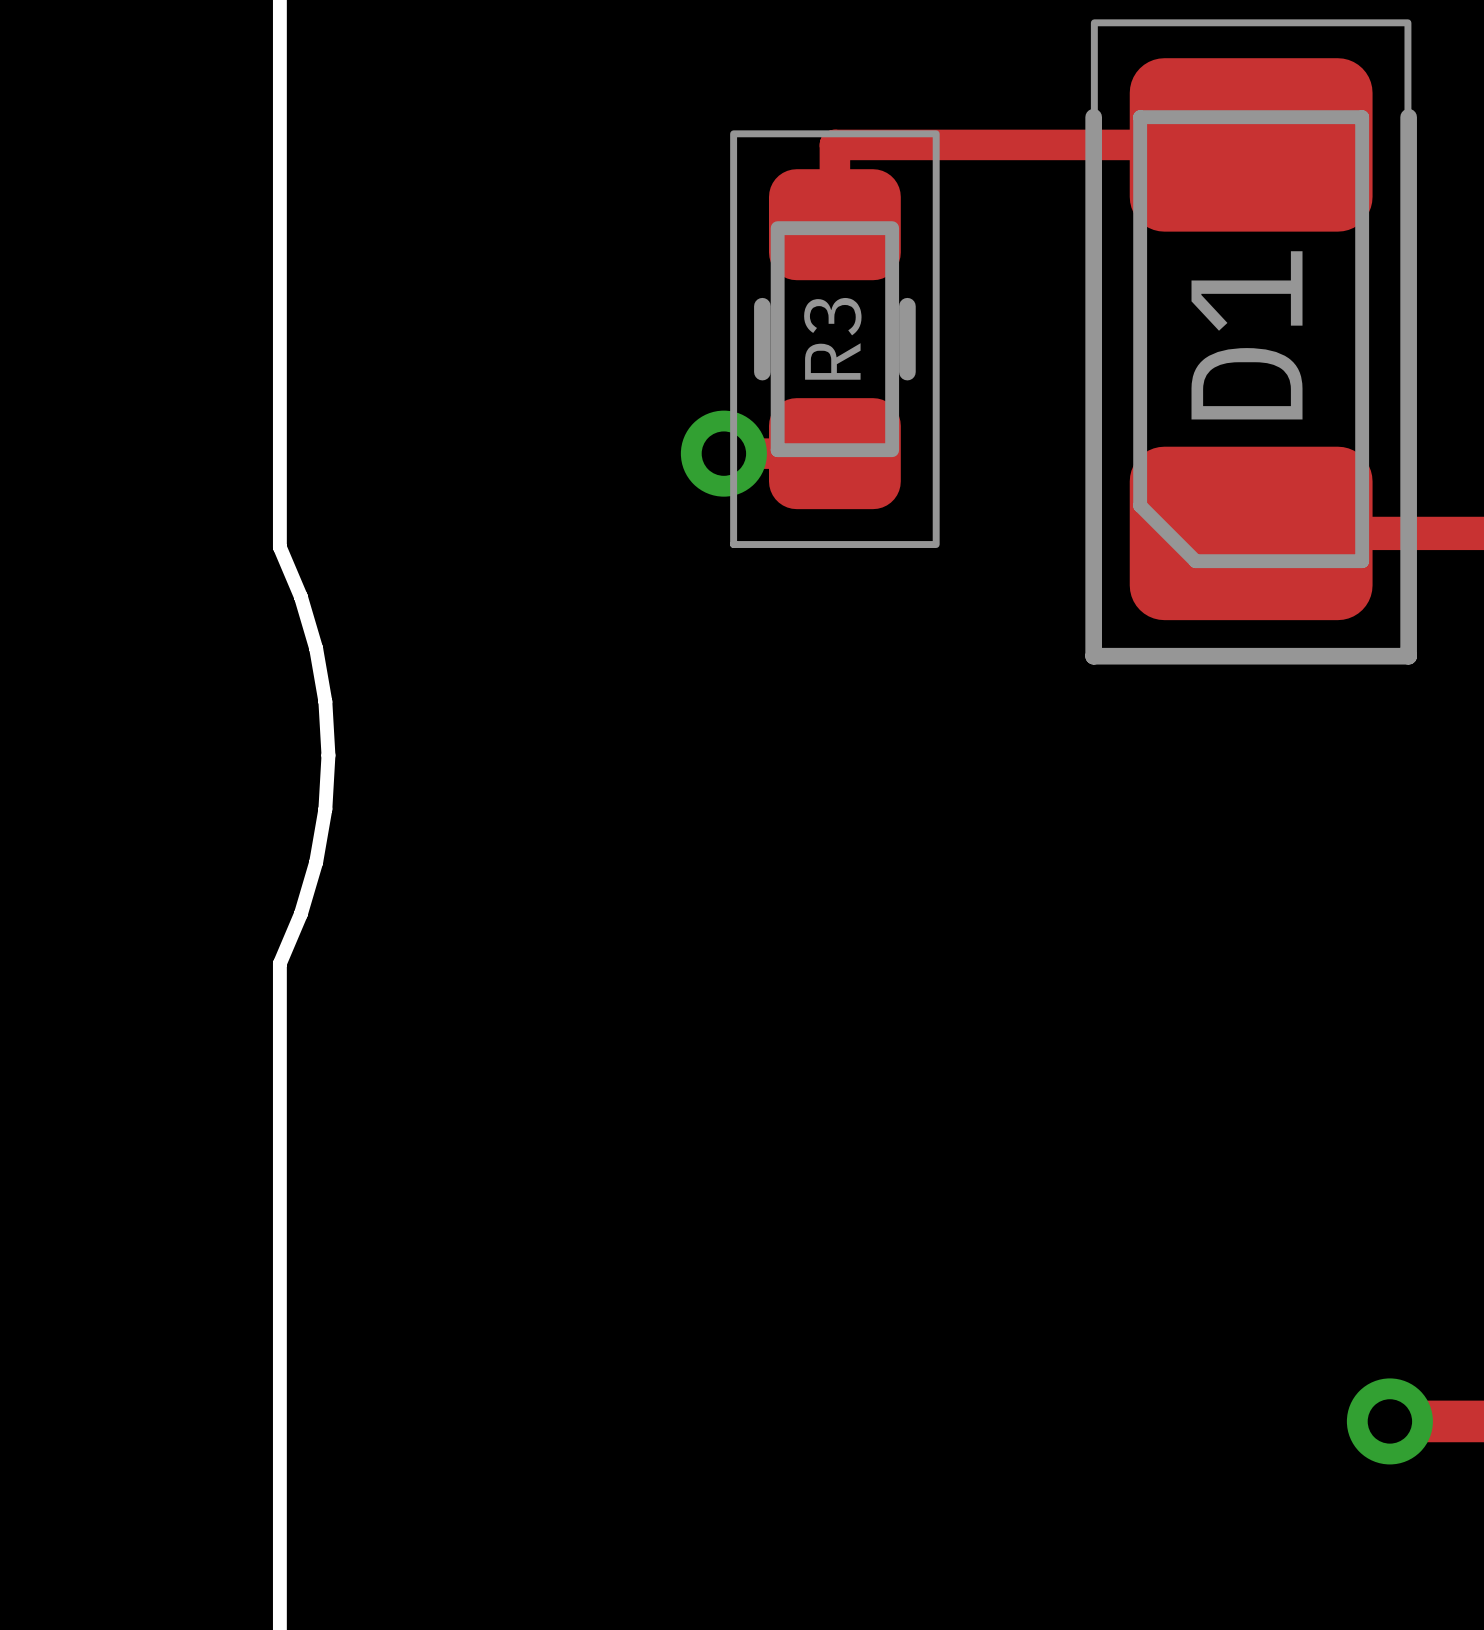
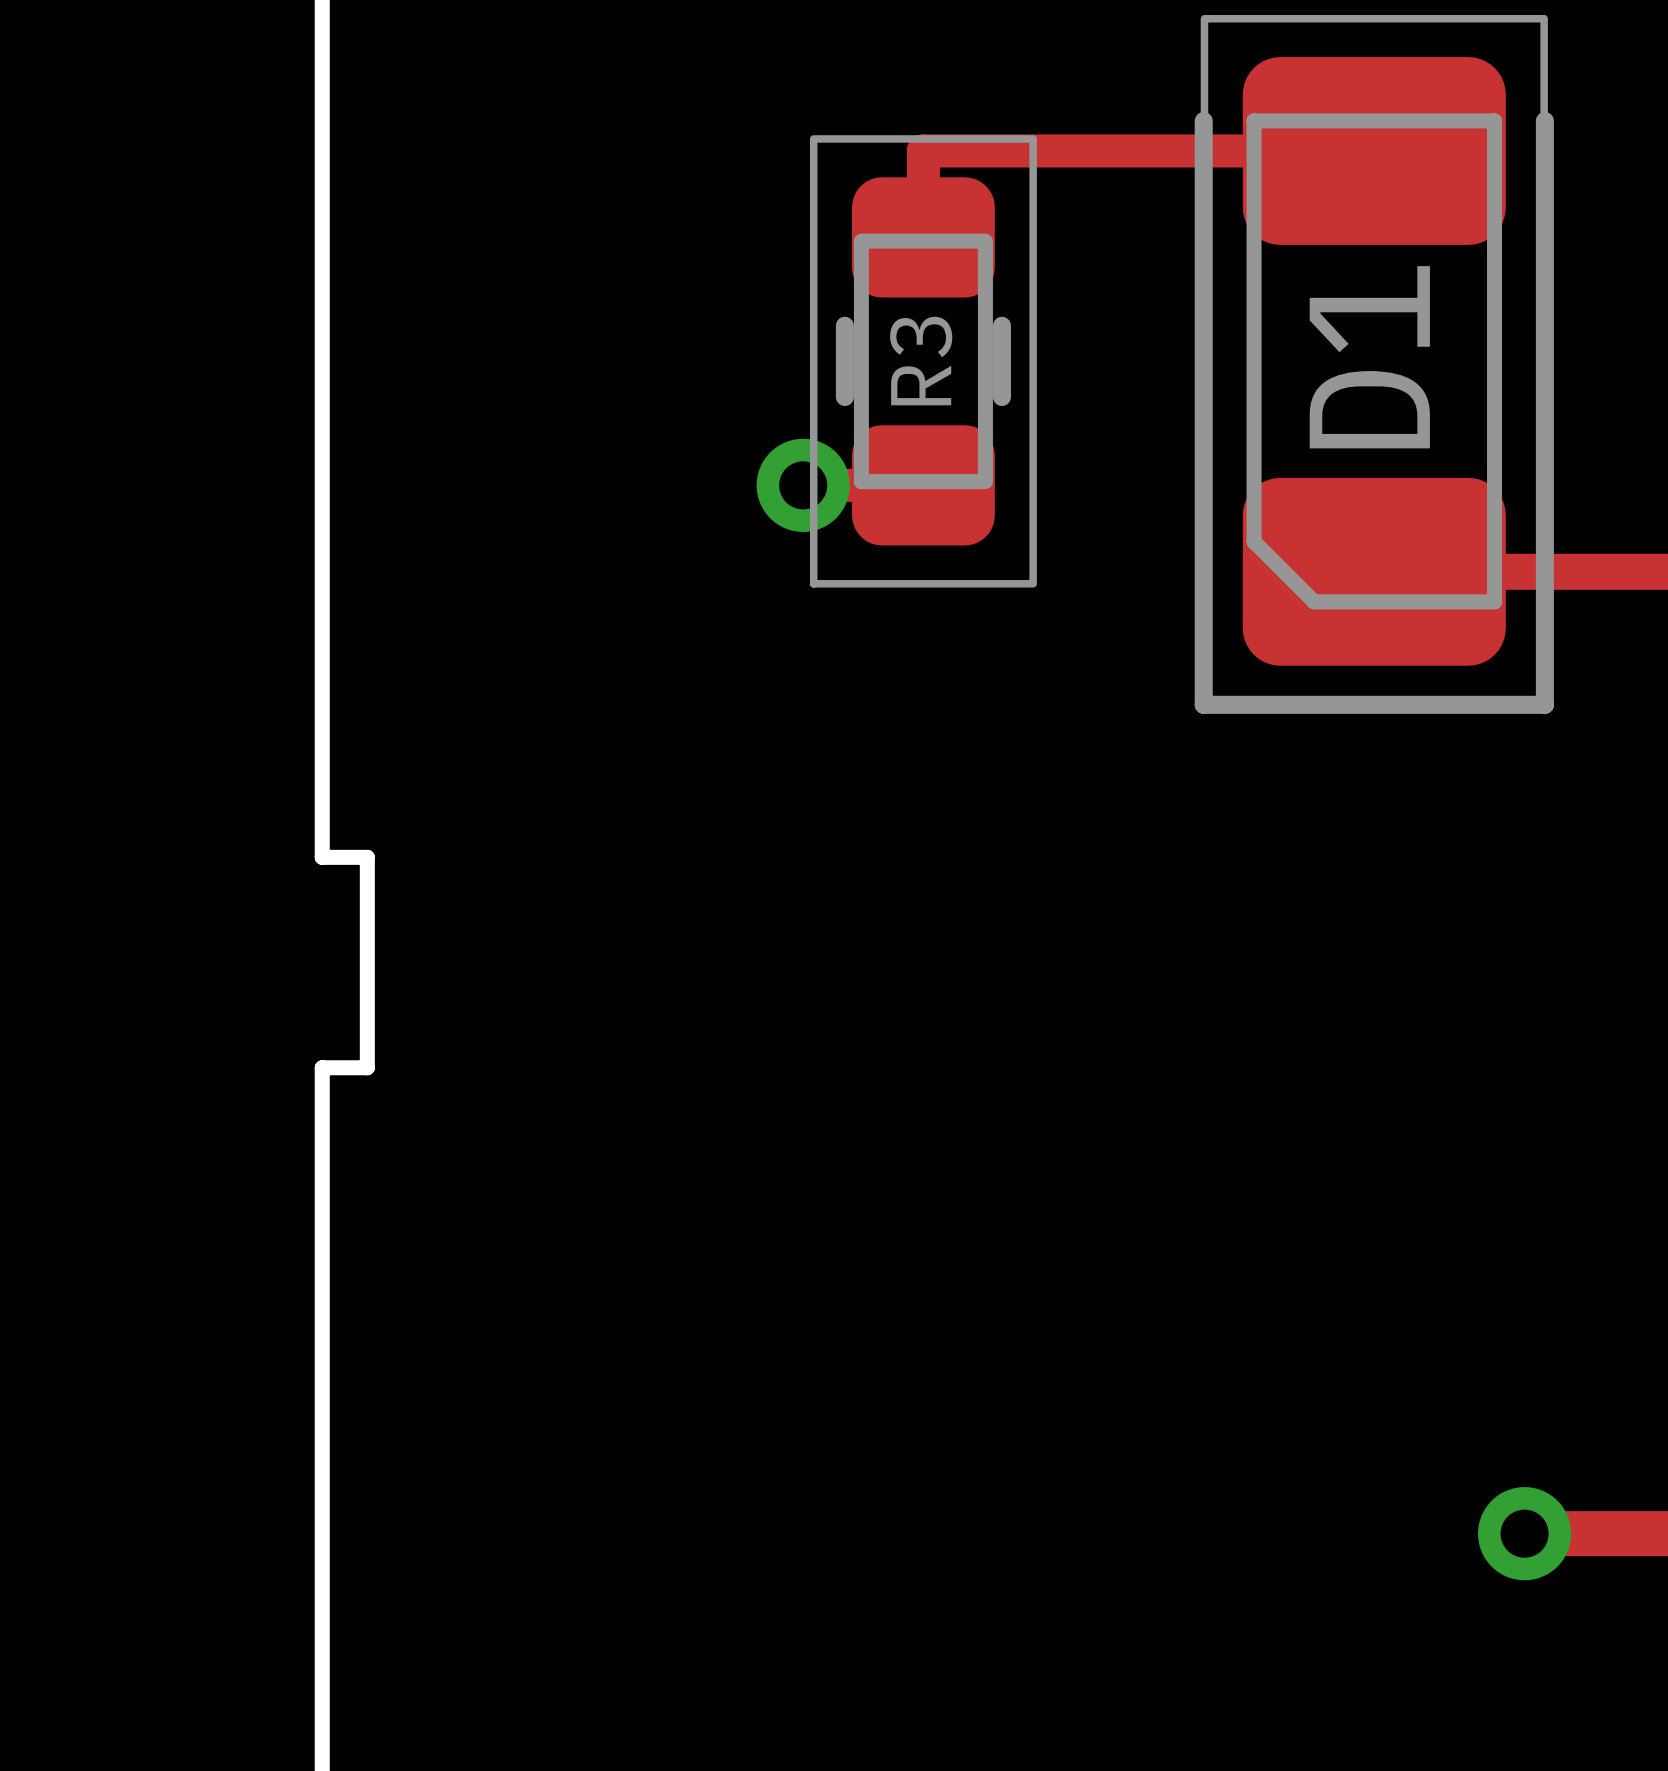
board edge: (279, 547) (300, 596) (316, 648) (325, 701) (328, 755) (325, 809) (316, 862) (300, 913) (279, 963) (279, 991) -> (322, 586) (322, 857) (367, 857) (367, 1067) (322, 1067)

